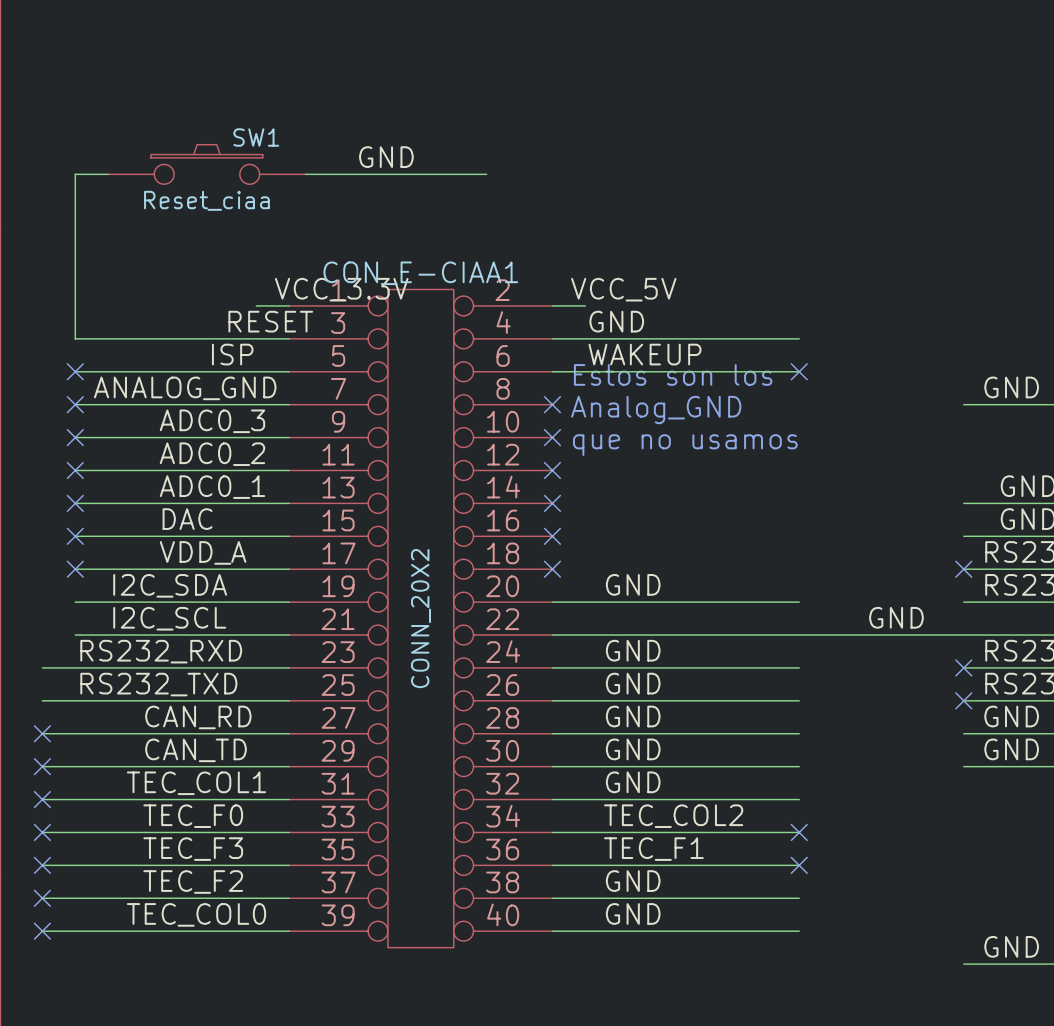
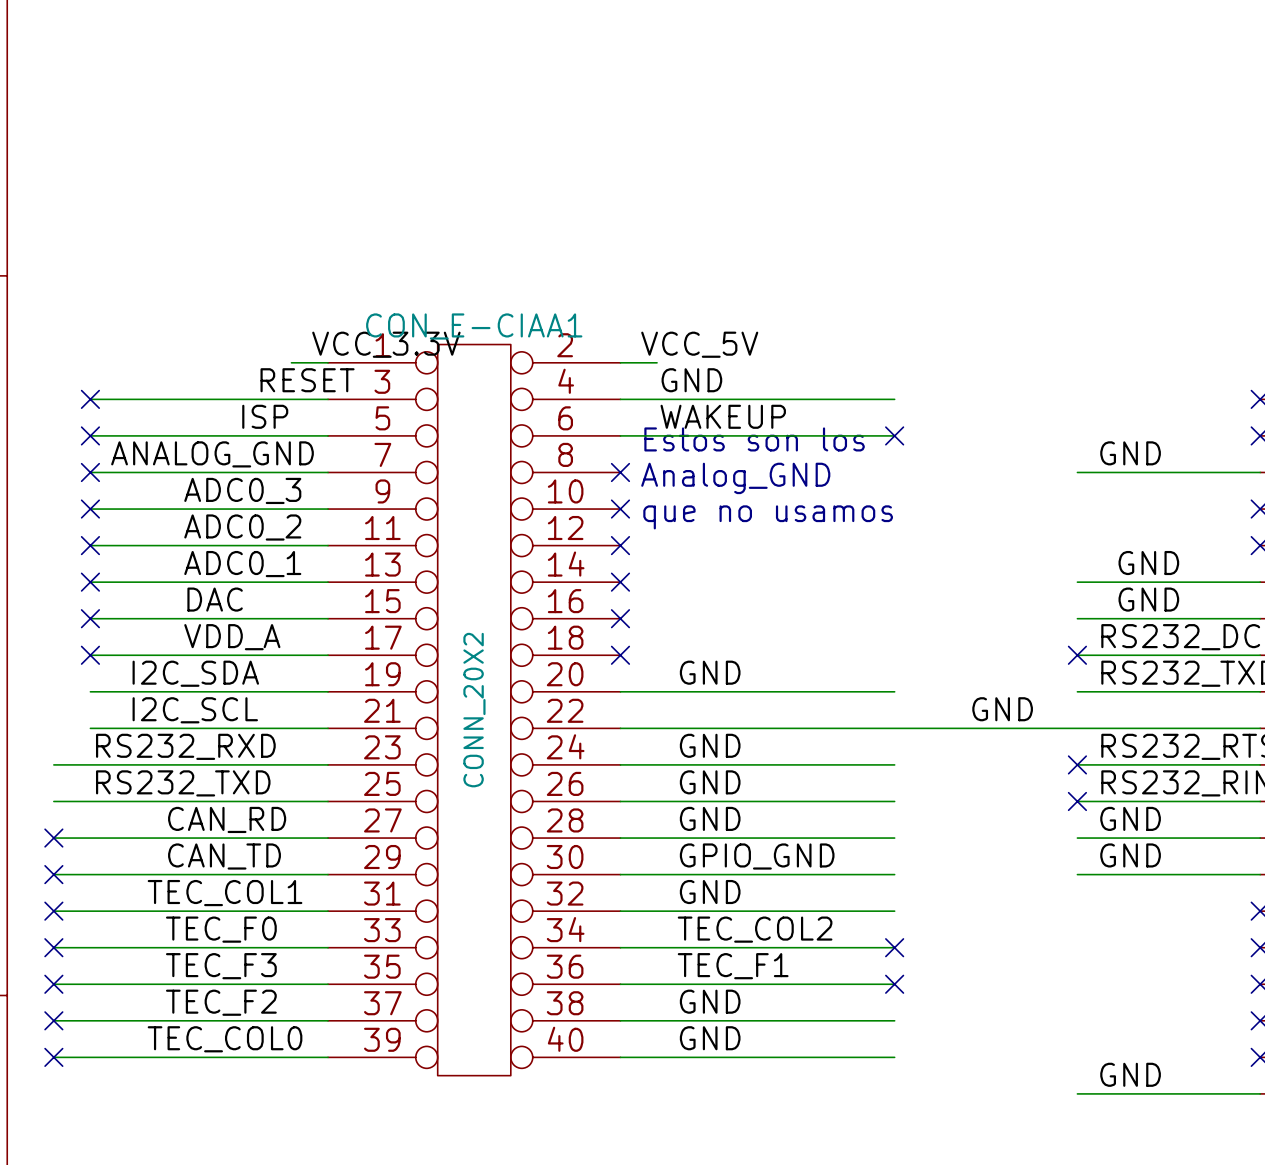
label: GND (386, 157) -> none
SW1: Reset_ciaa (206, 164) -> none
wire: (108, 174) (75, 174) (75, 338) -> none
wire: (305, 174) (486, 174) -> none
no-connect mark: none -> (90, 399)
label: GND (633, 749) -> GPIO_GND (757, 856)

